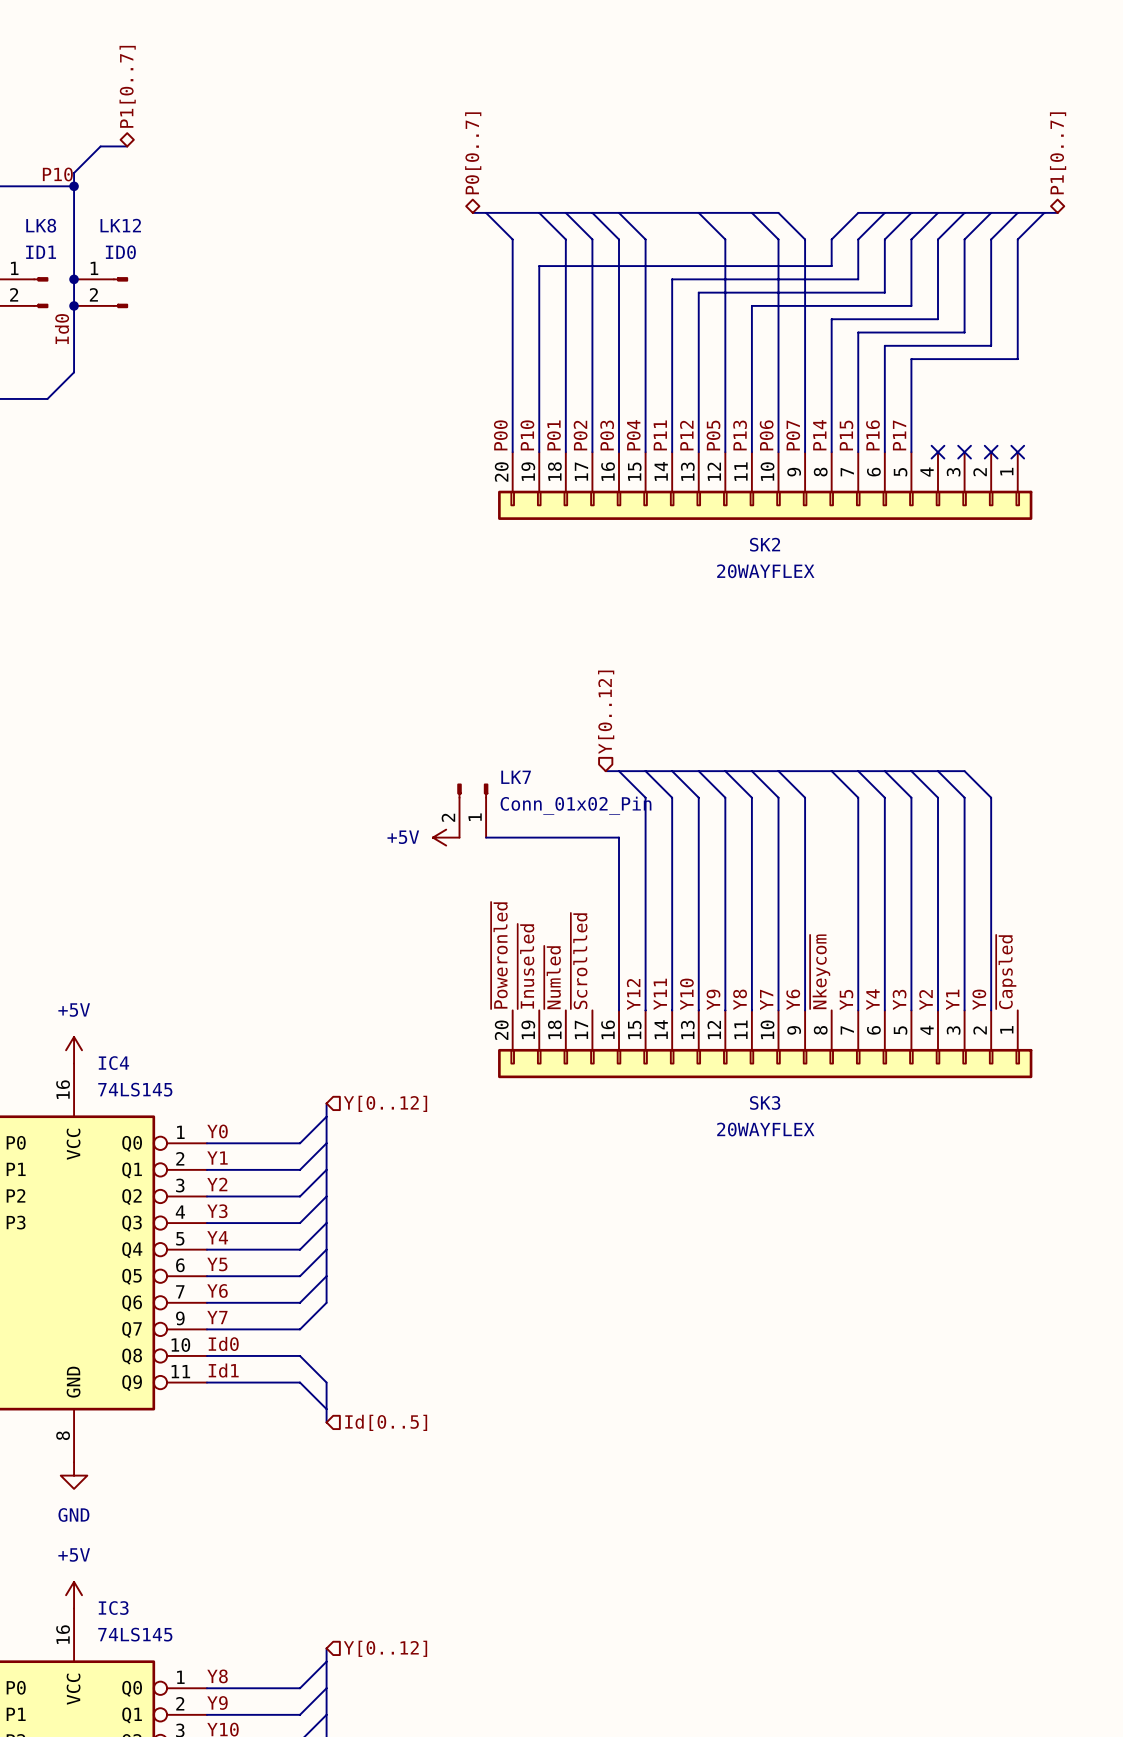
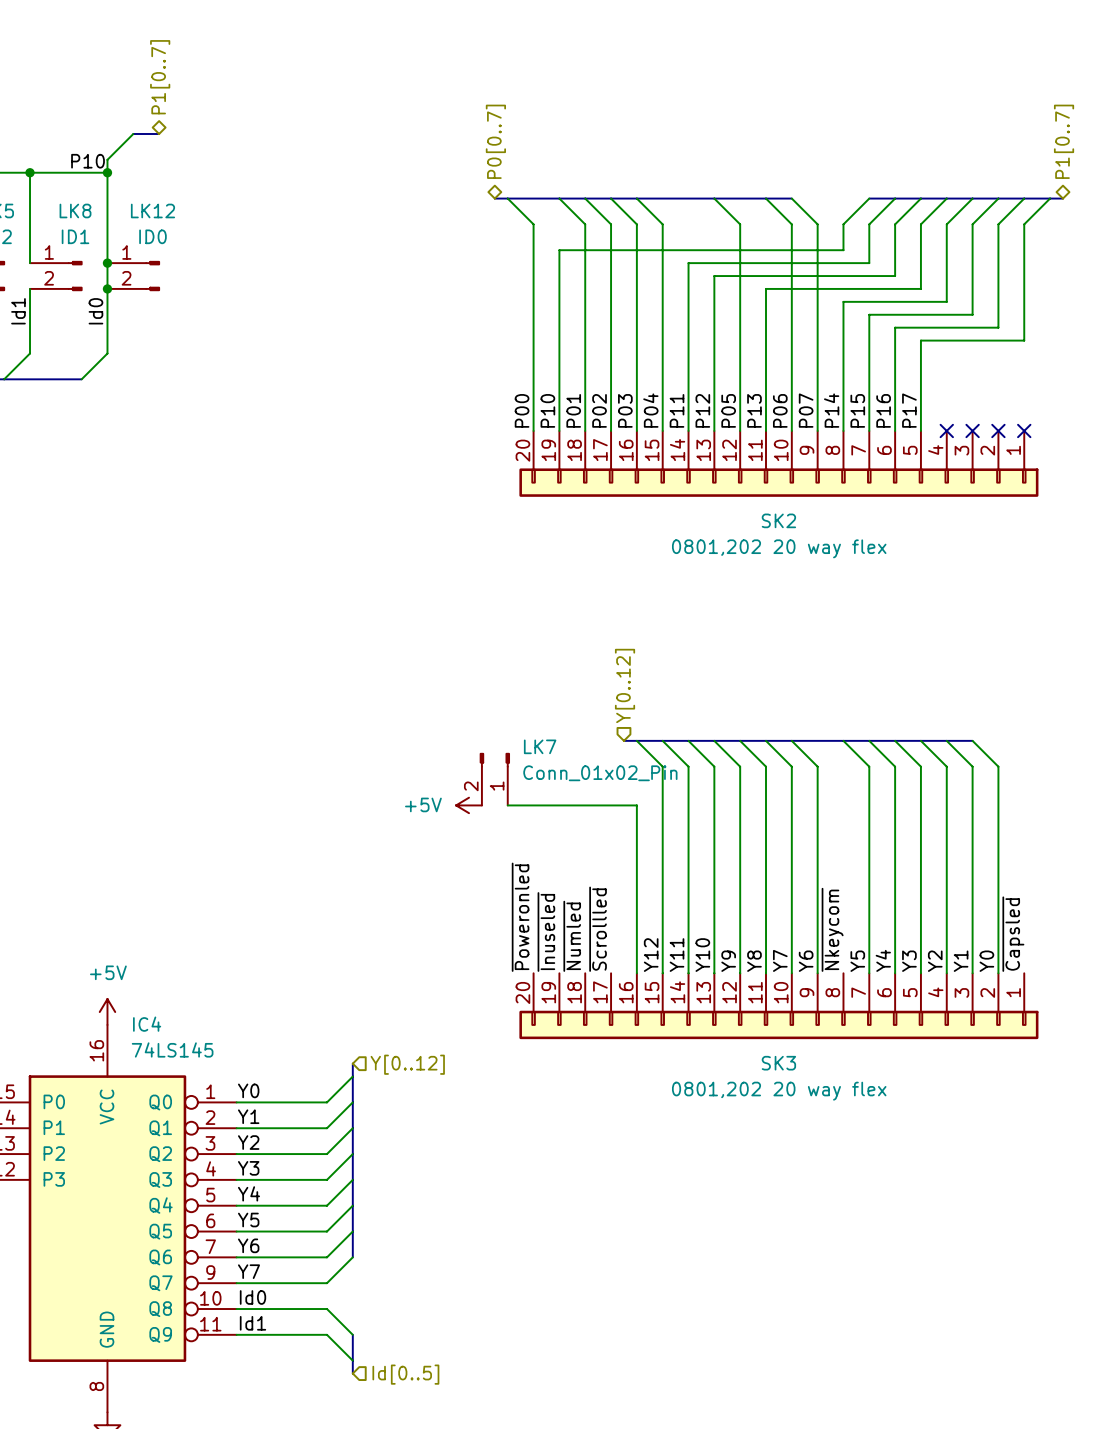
SK2 value: 20WAYFLEX (765, 571) -> 0801,202 20 way flex (779, 548)
SK3 value: 20WAYFLEX (765, 1129) -> 0801,202 20 way flex (779, 1091)

